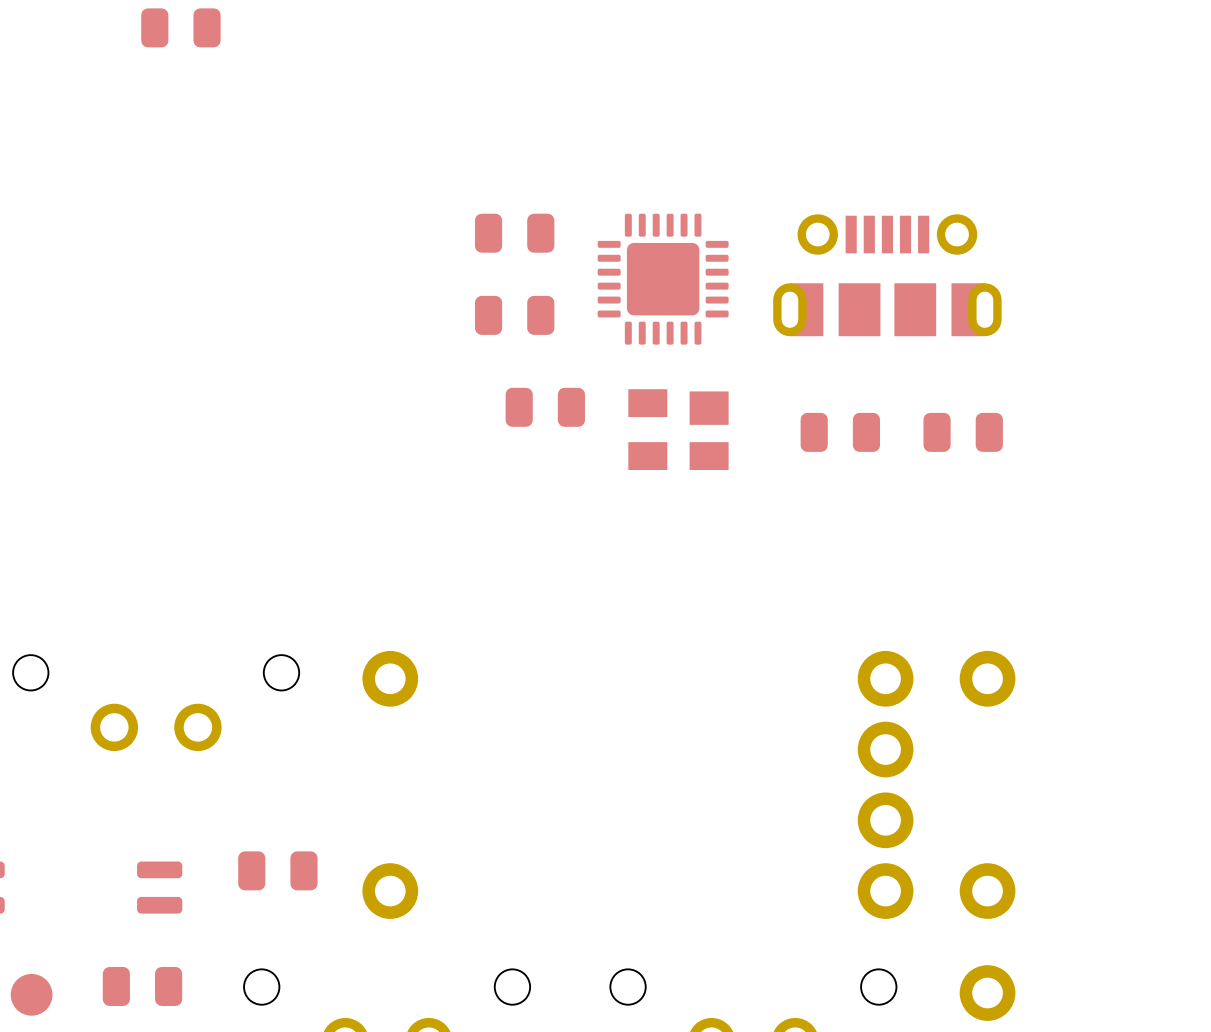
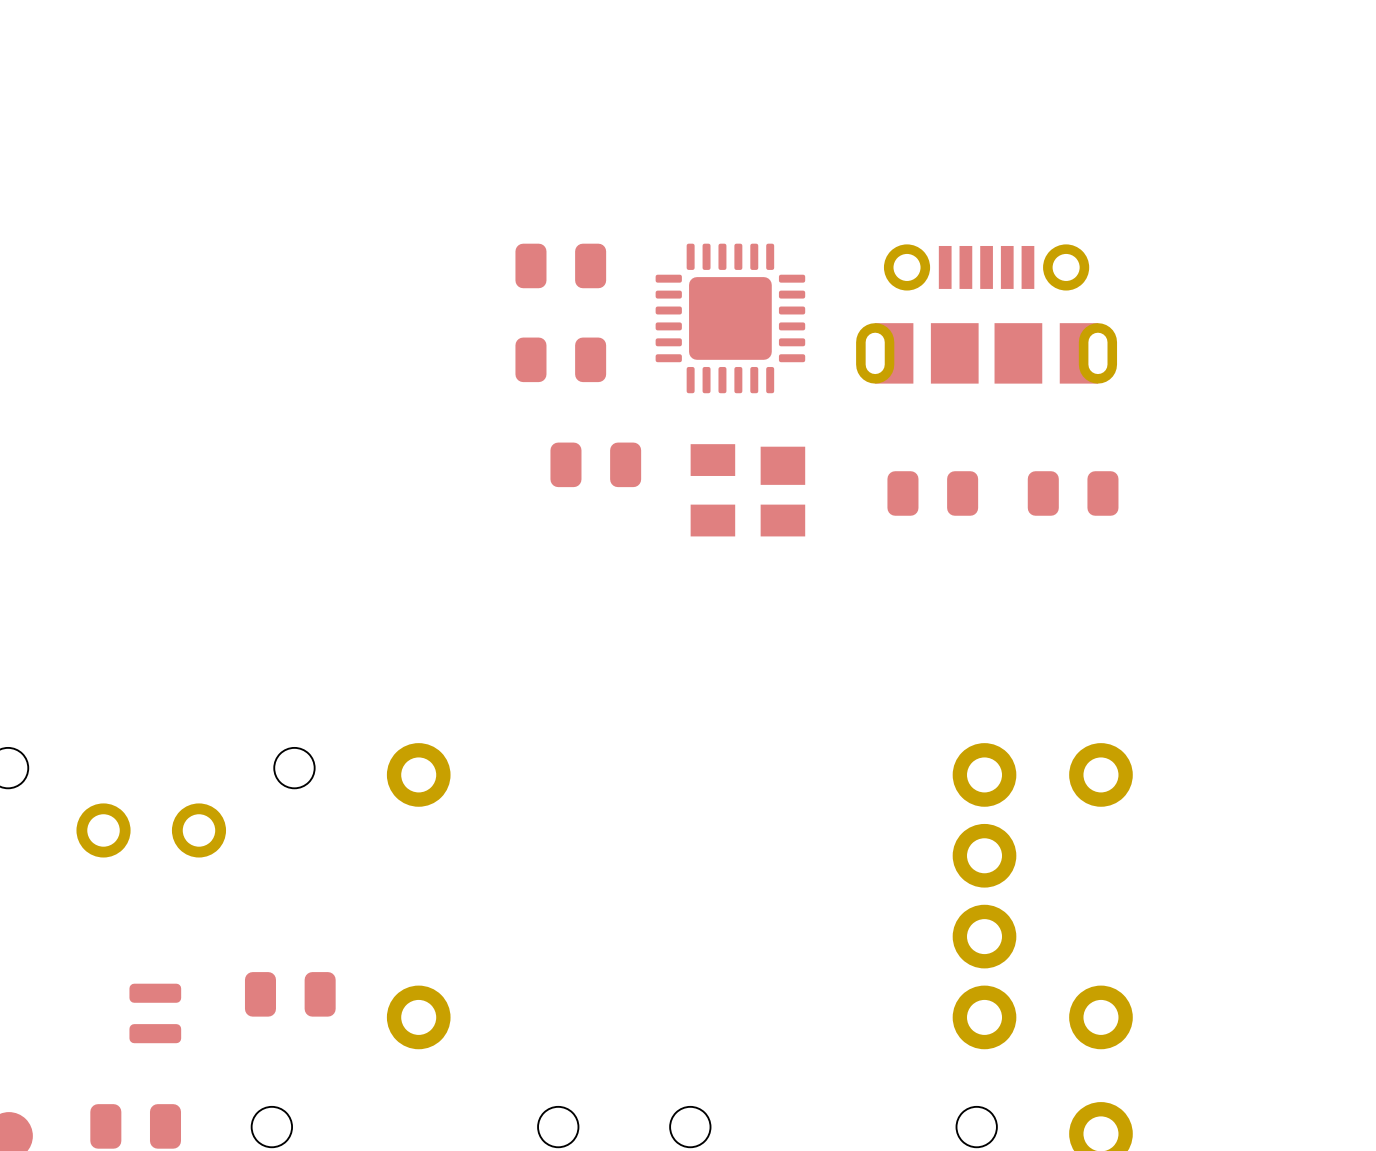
part: (180, 27) -> none

